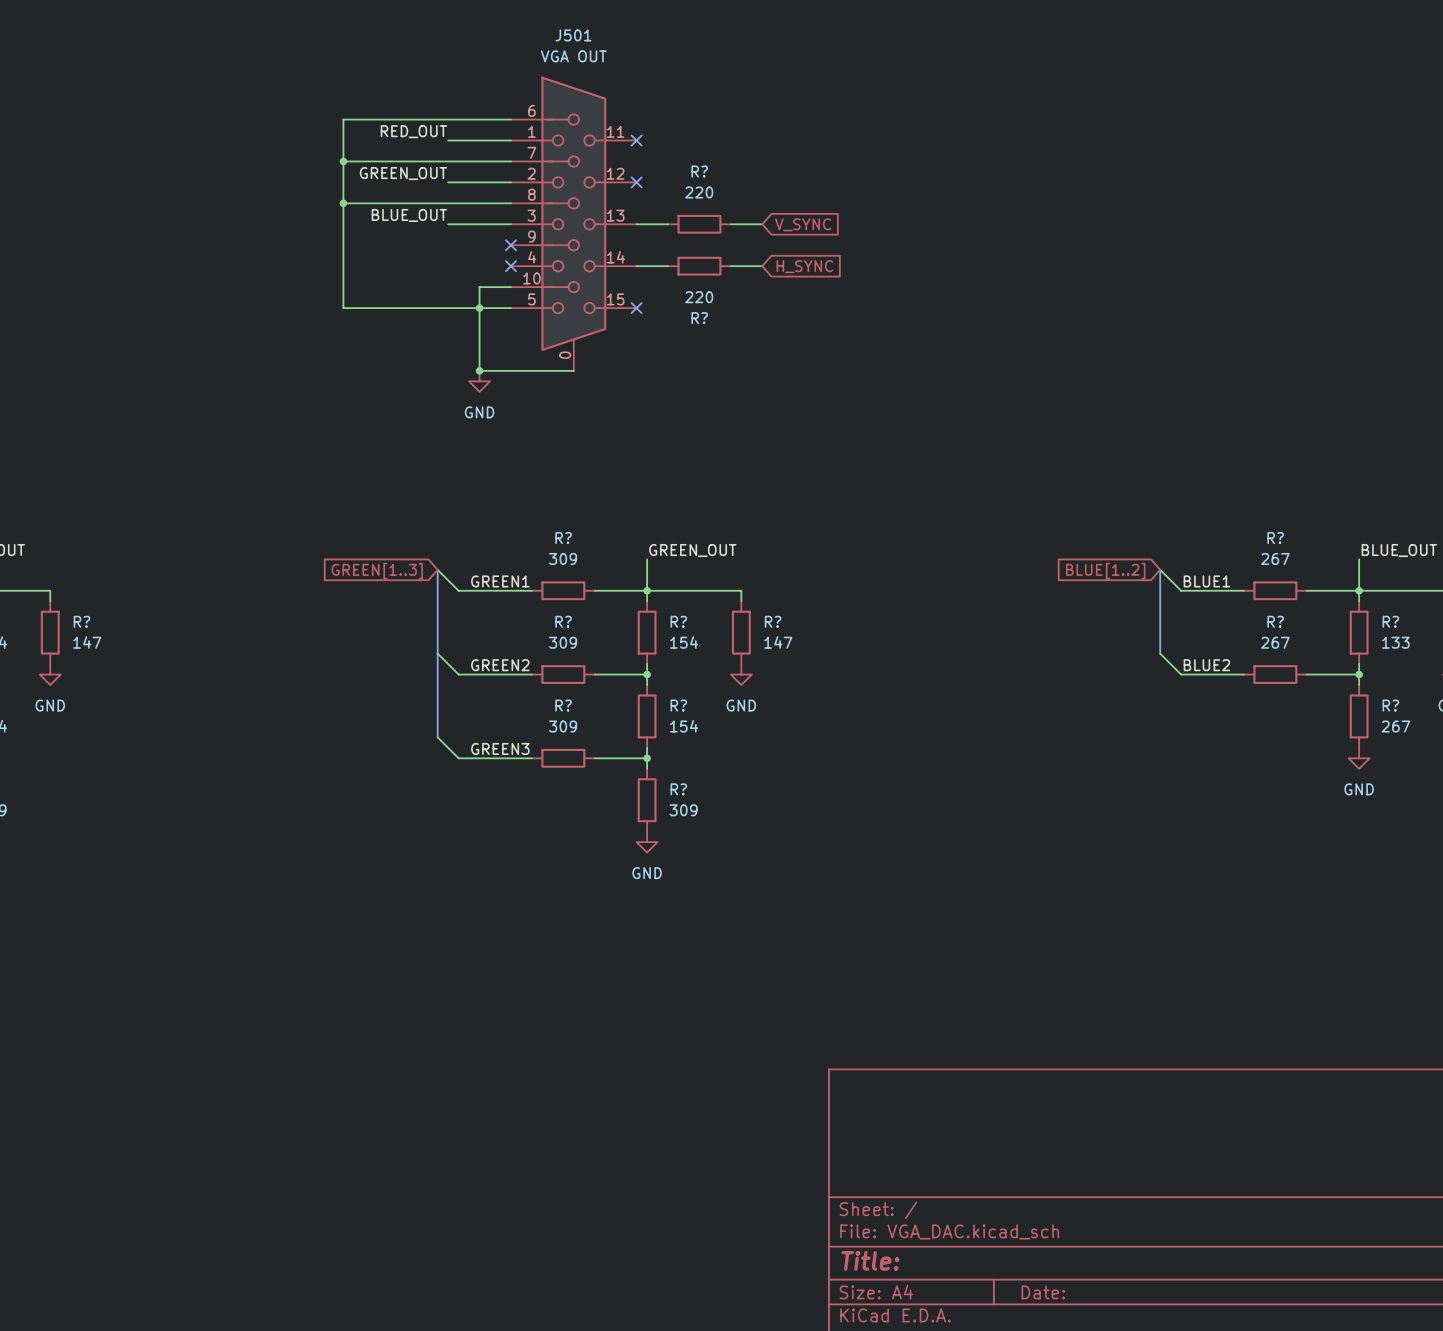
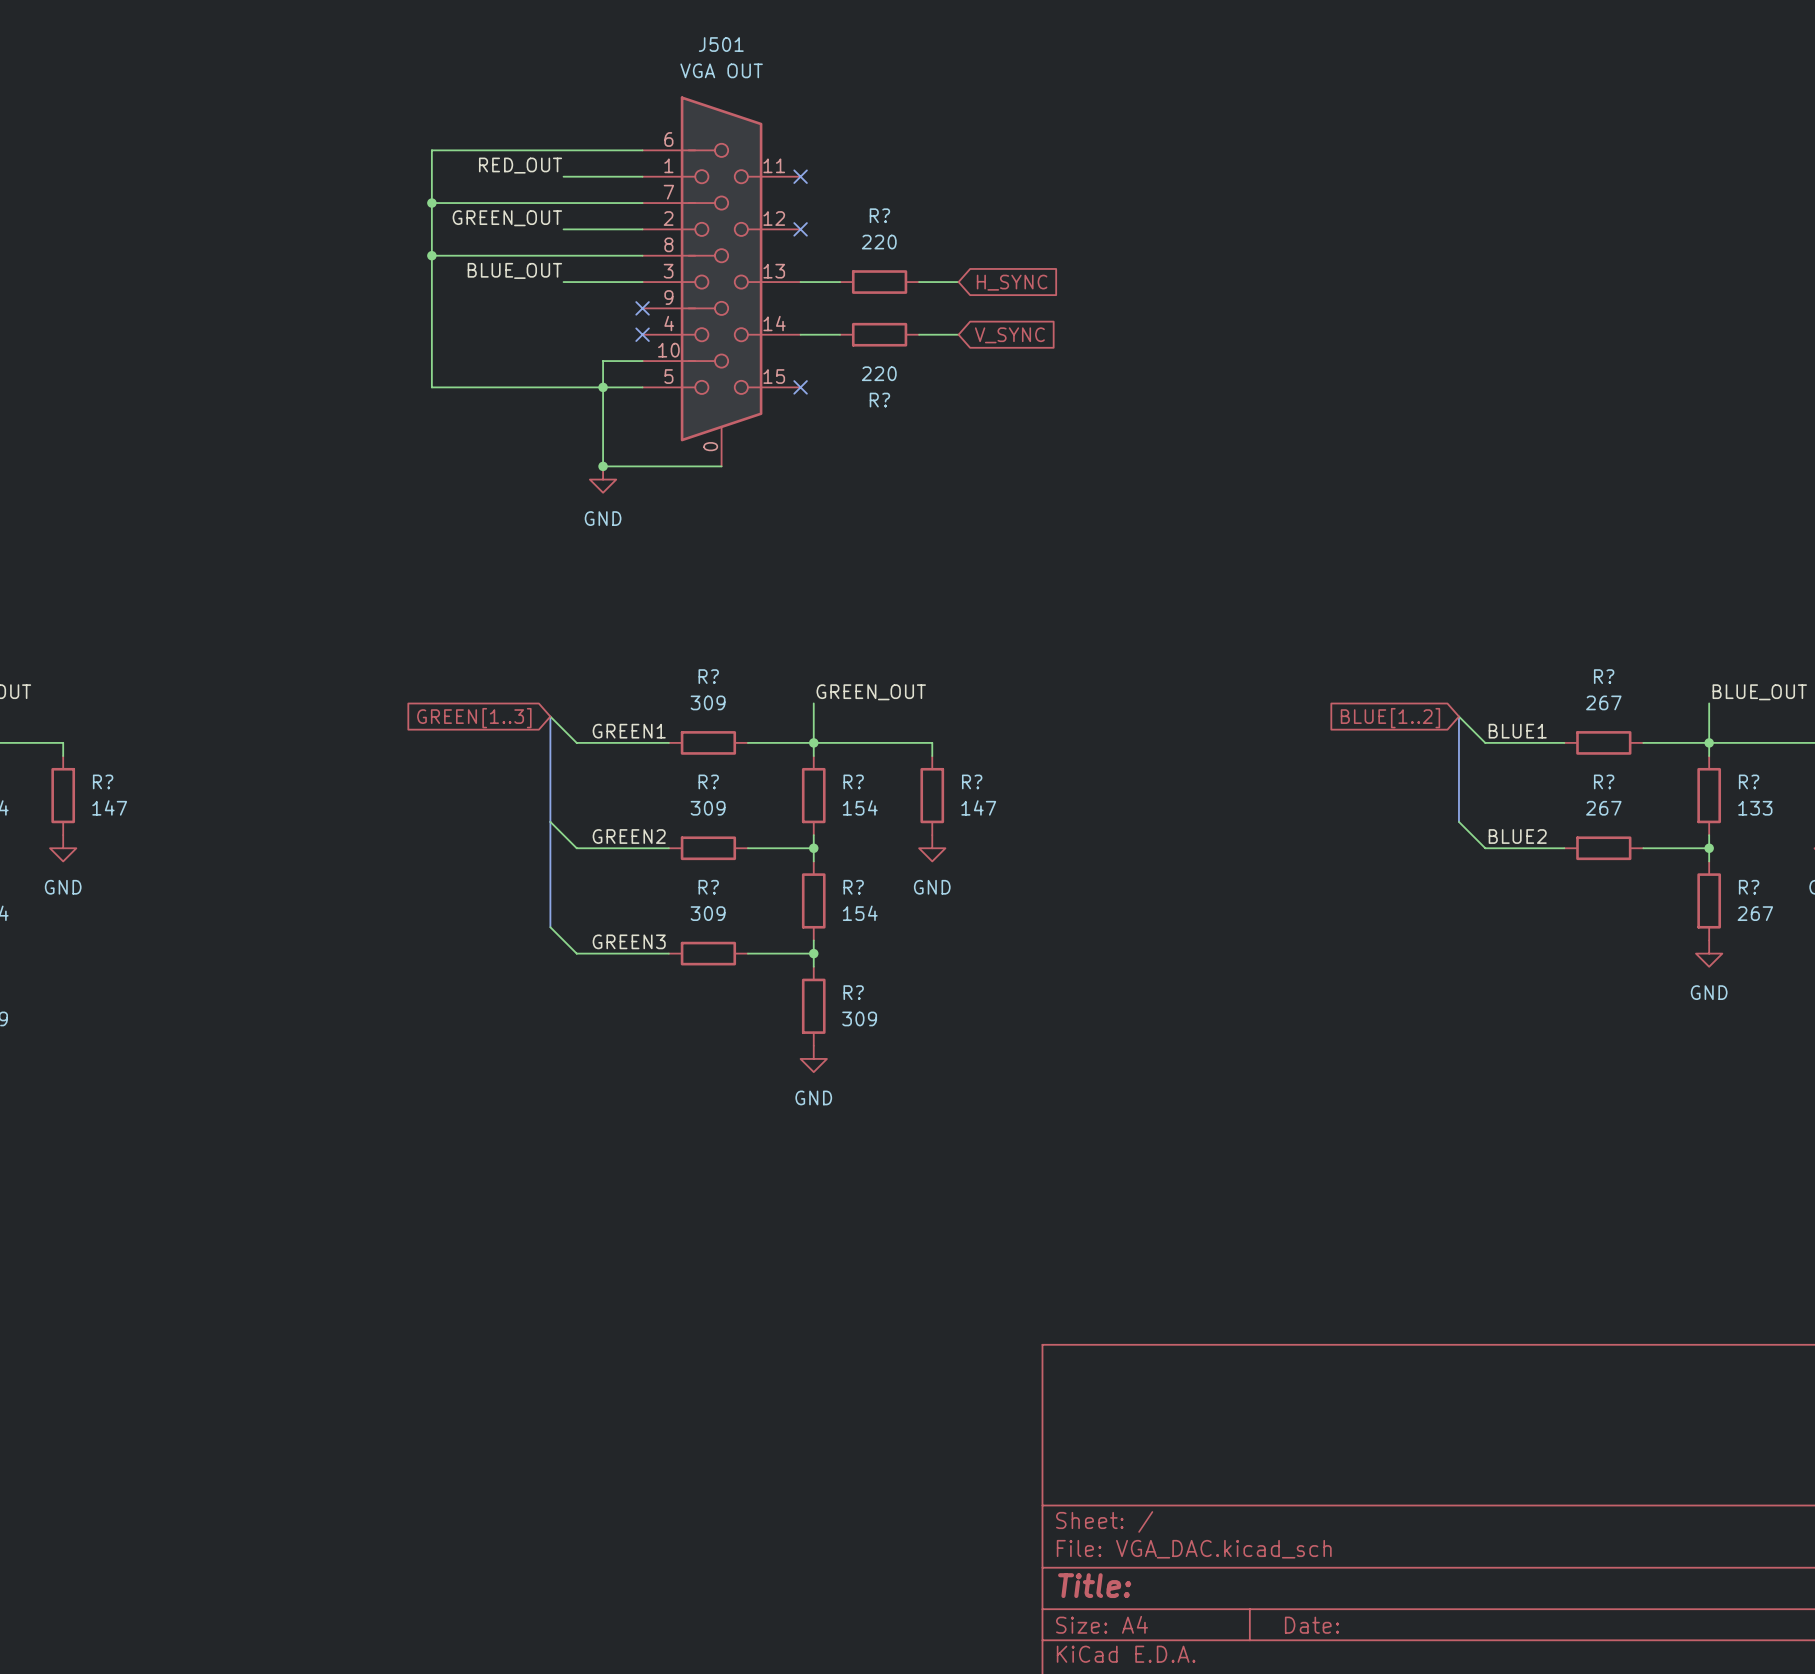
global label: V_SYNC (803, 224) -> H_SYNC (1012, 282)
global label: H_SYNC (804, 266) -> V_SYNC (1009, 335)

